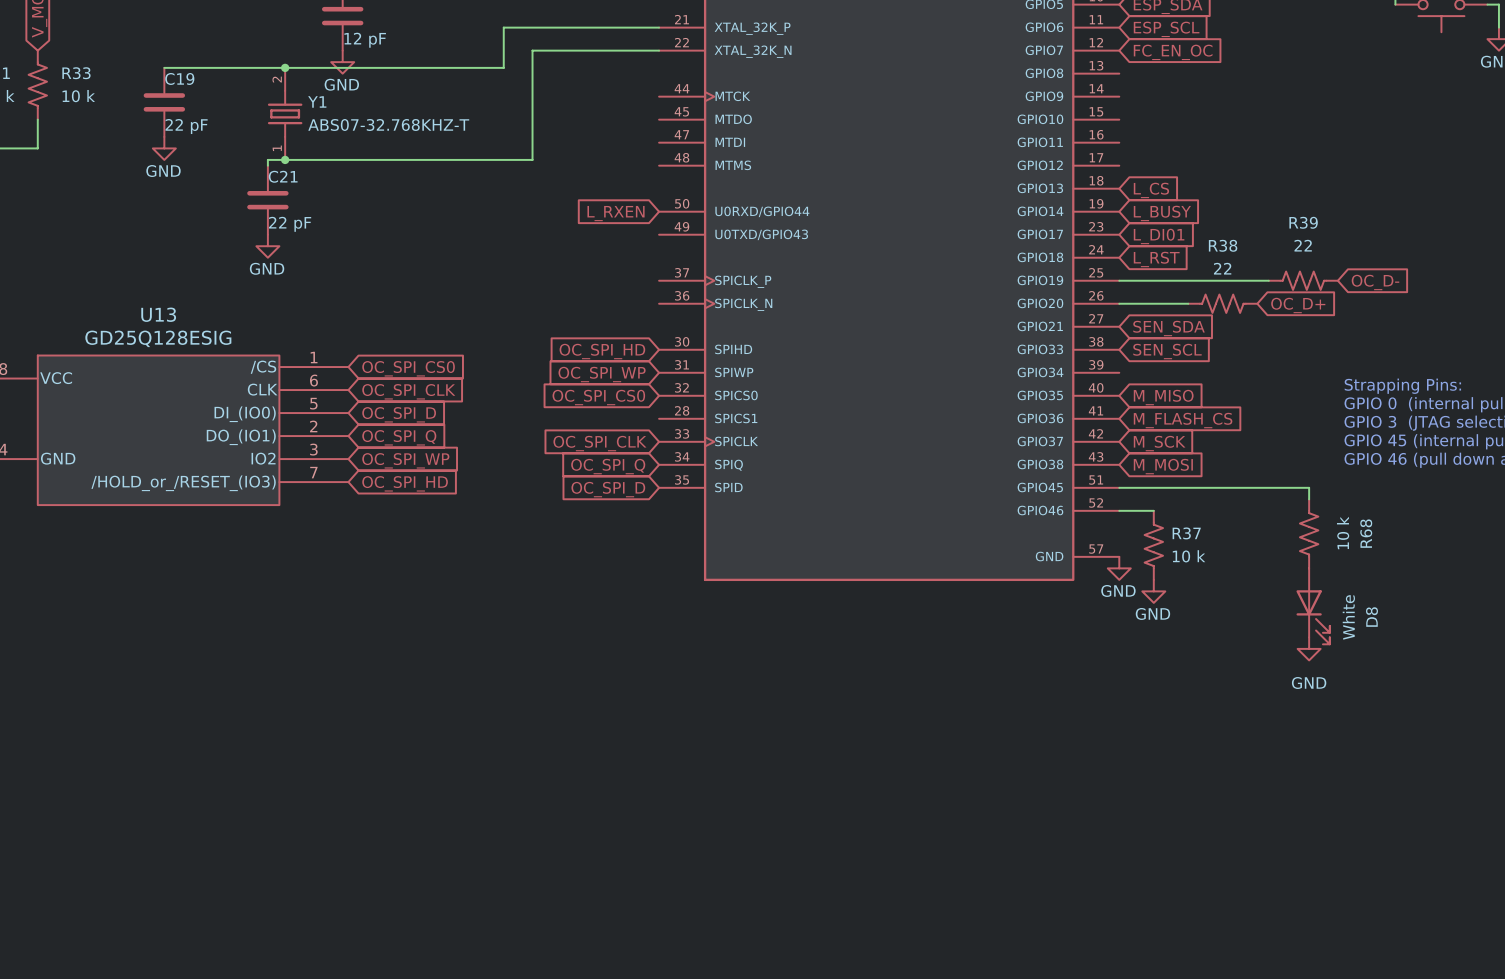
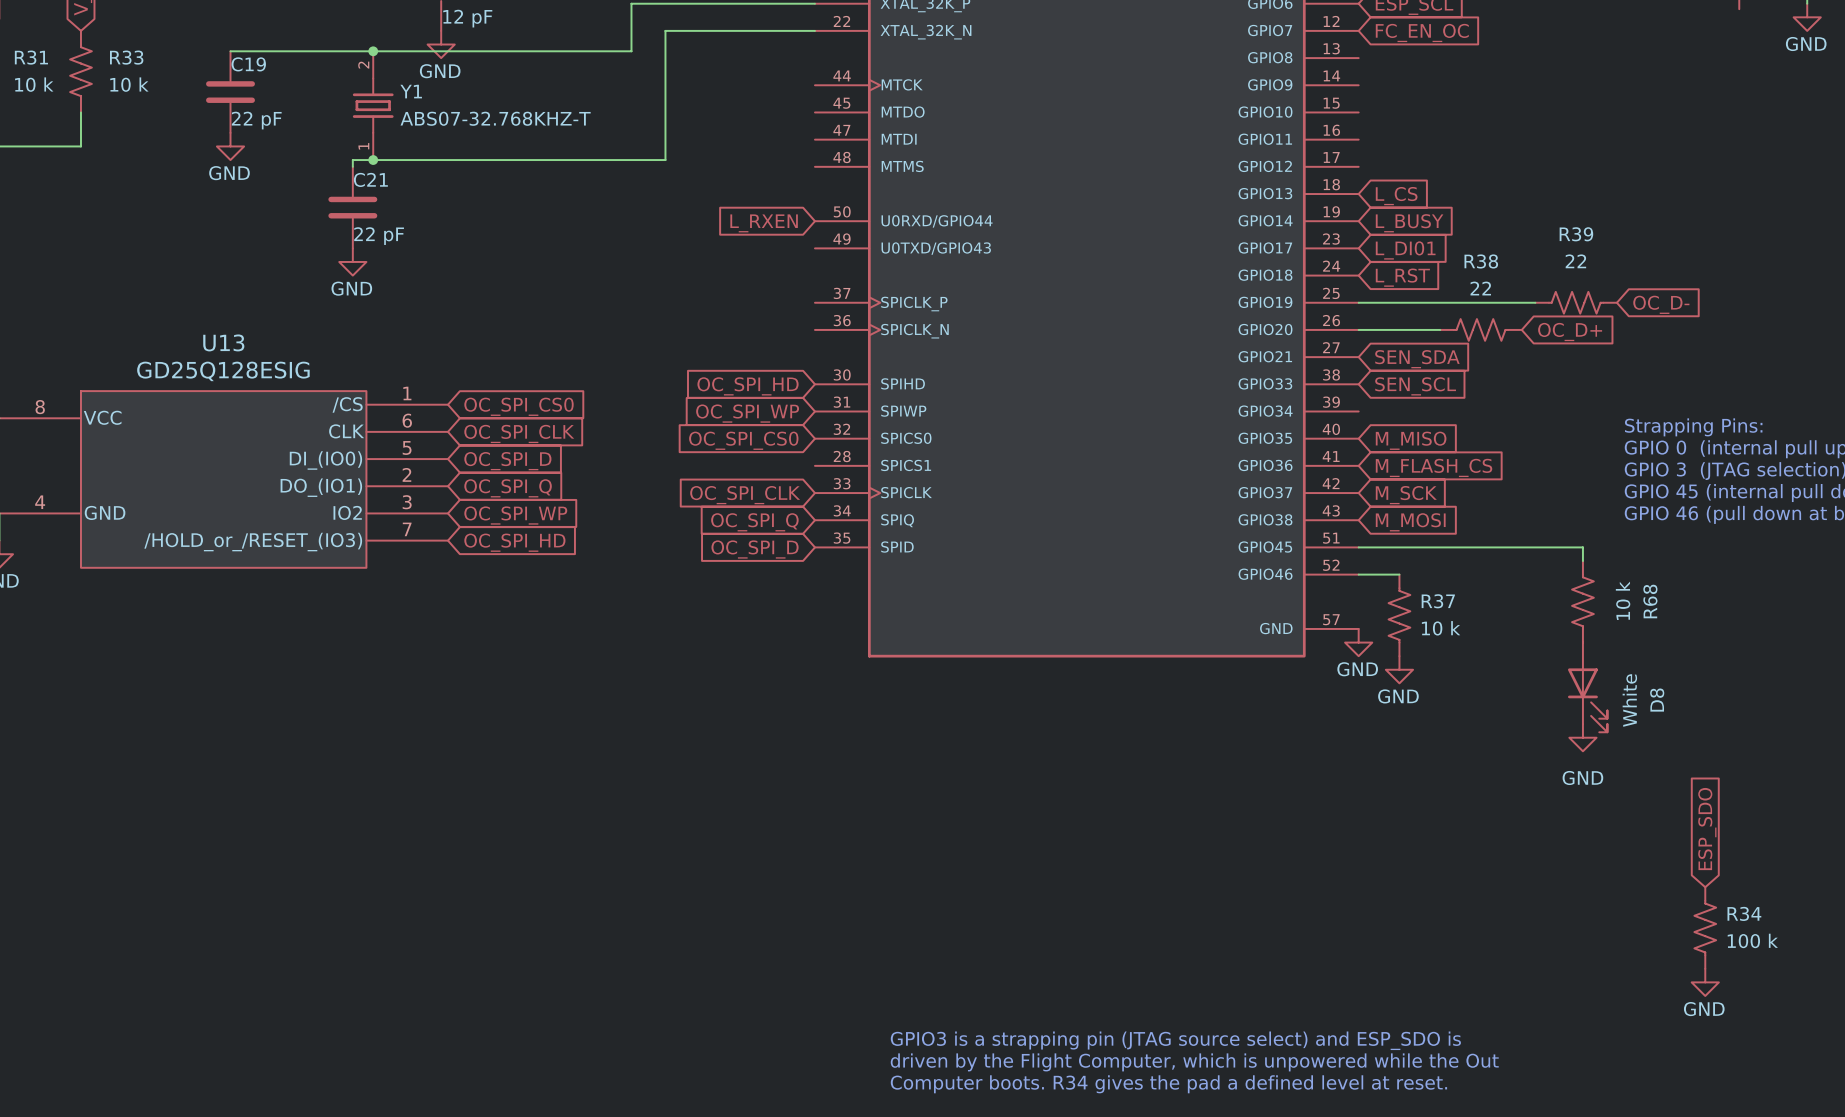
global label: none -> ESP_SDO (1707, 829)
R34: none -> 100 k (1705, 928)
power symbol: none -> GND (1705, 982)
text: none -> GPIO3 is a strapping pin (JTAG source select) and ESP_SDO is (1175, 1040)
text: none -> driven by the Flight Computer, which is unpowered while the Out (1194, 1062)
text: none -> Computer boots. R34 gives the pad a defined level at reset. (1168, 1084)

